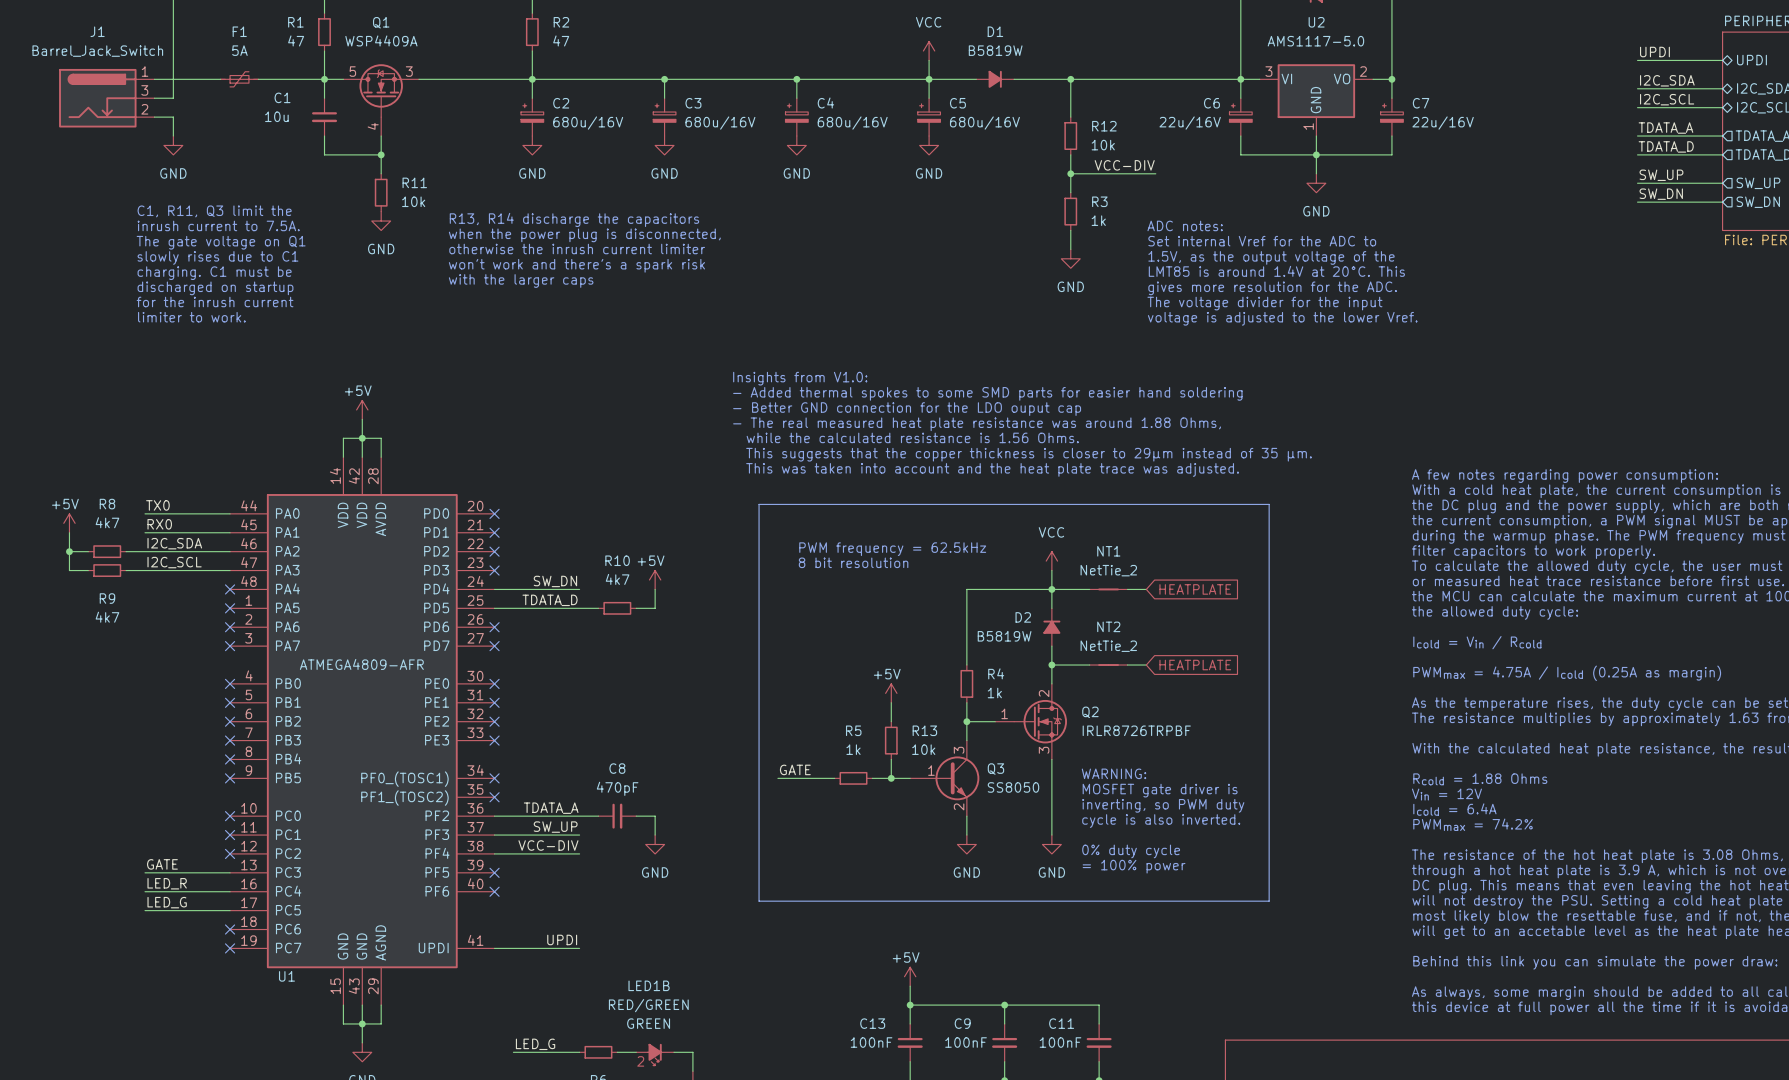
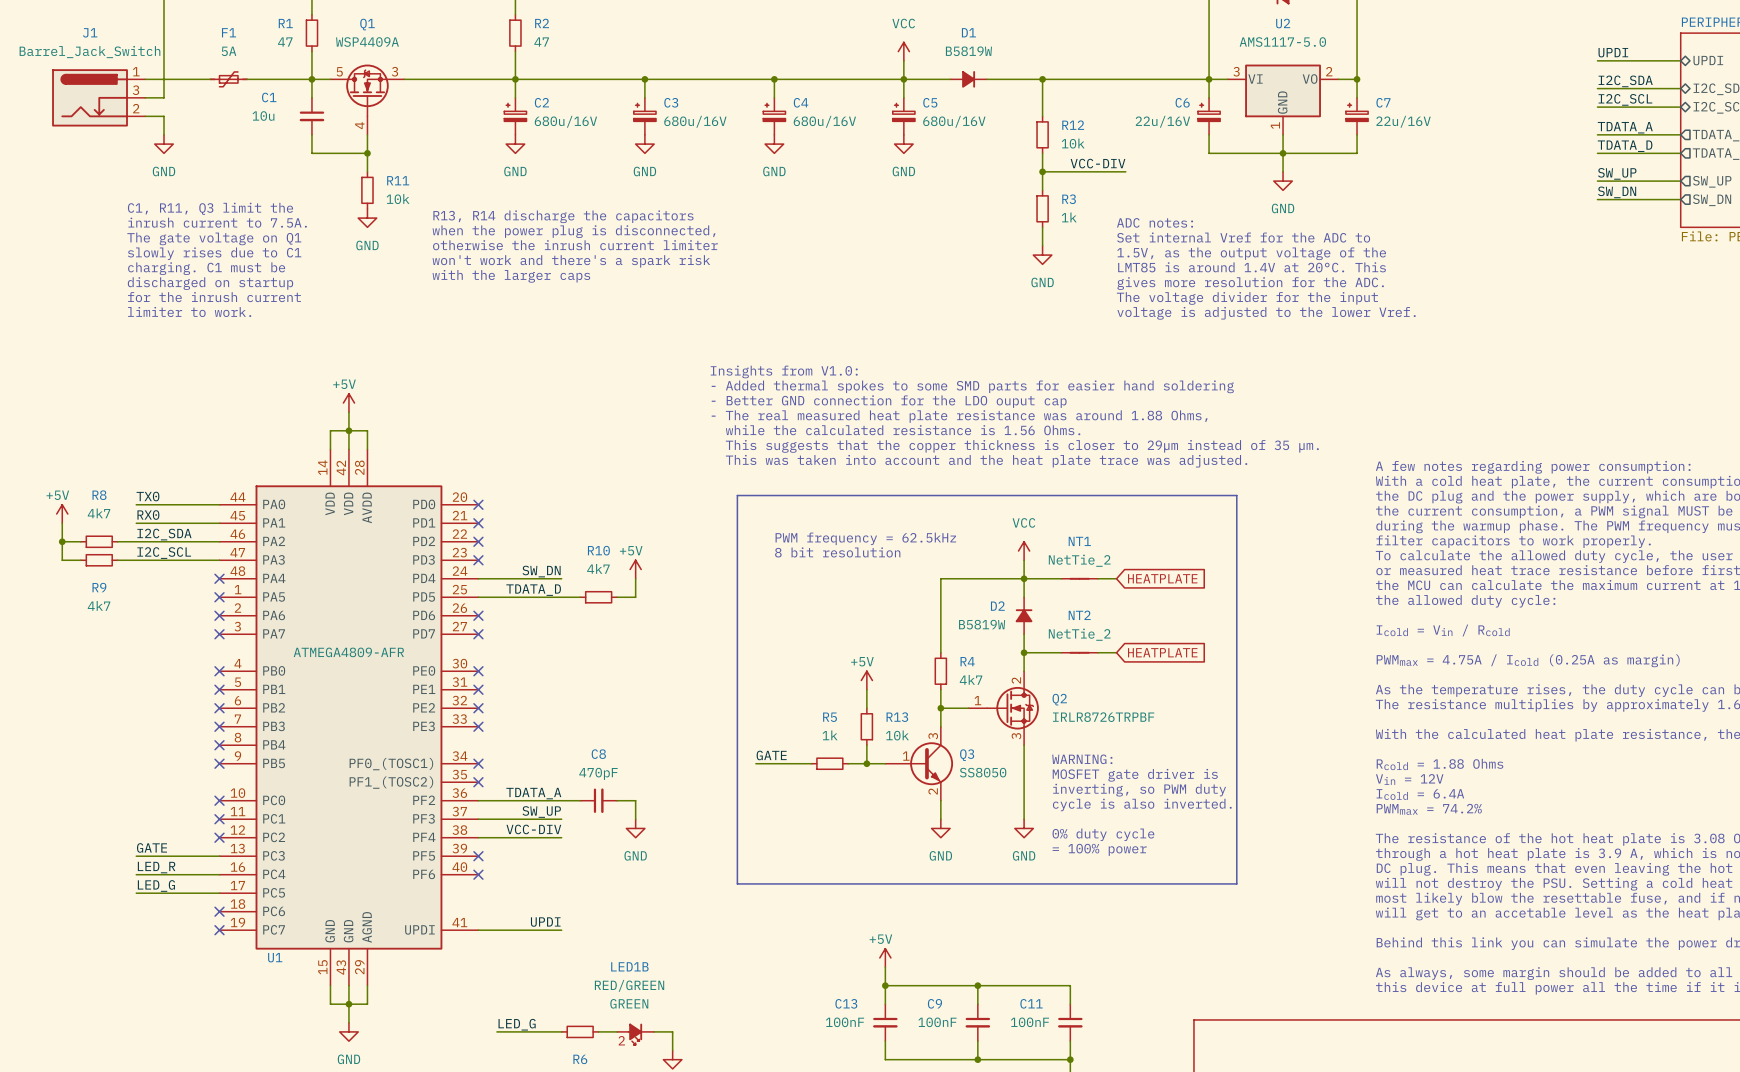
R4 value: 1k (994, 692) -> 4k7 (971, 679)

